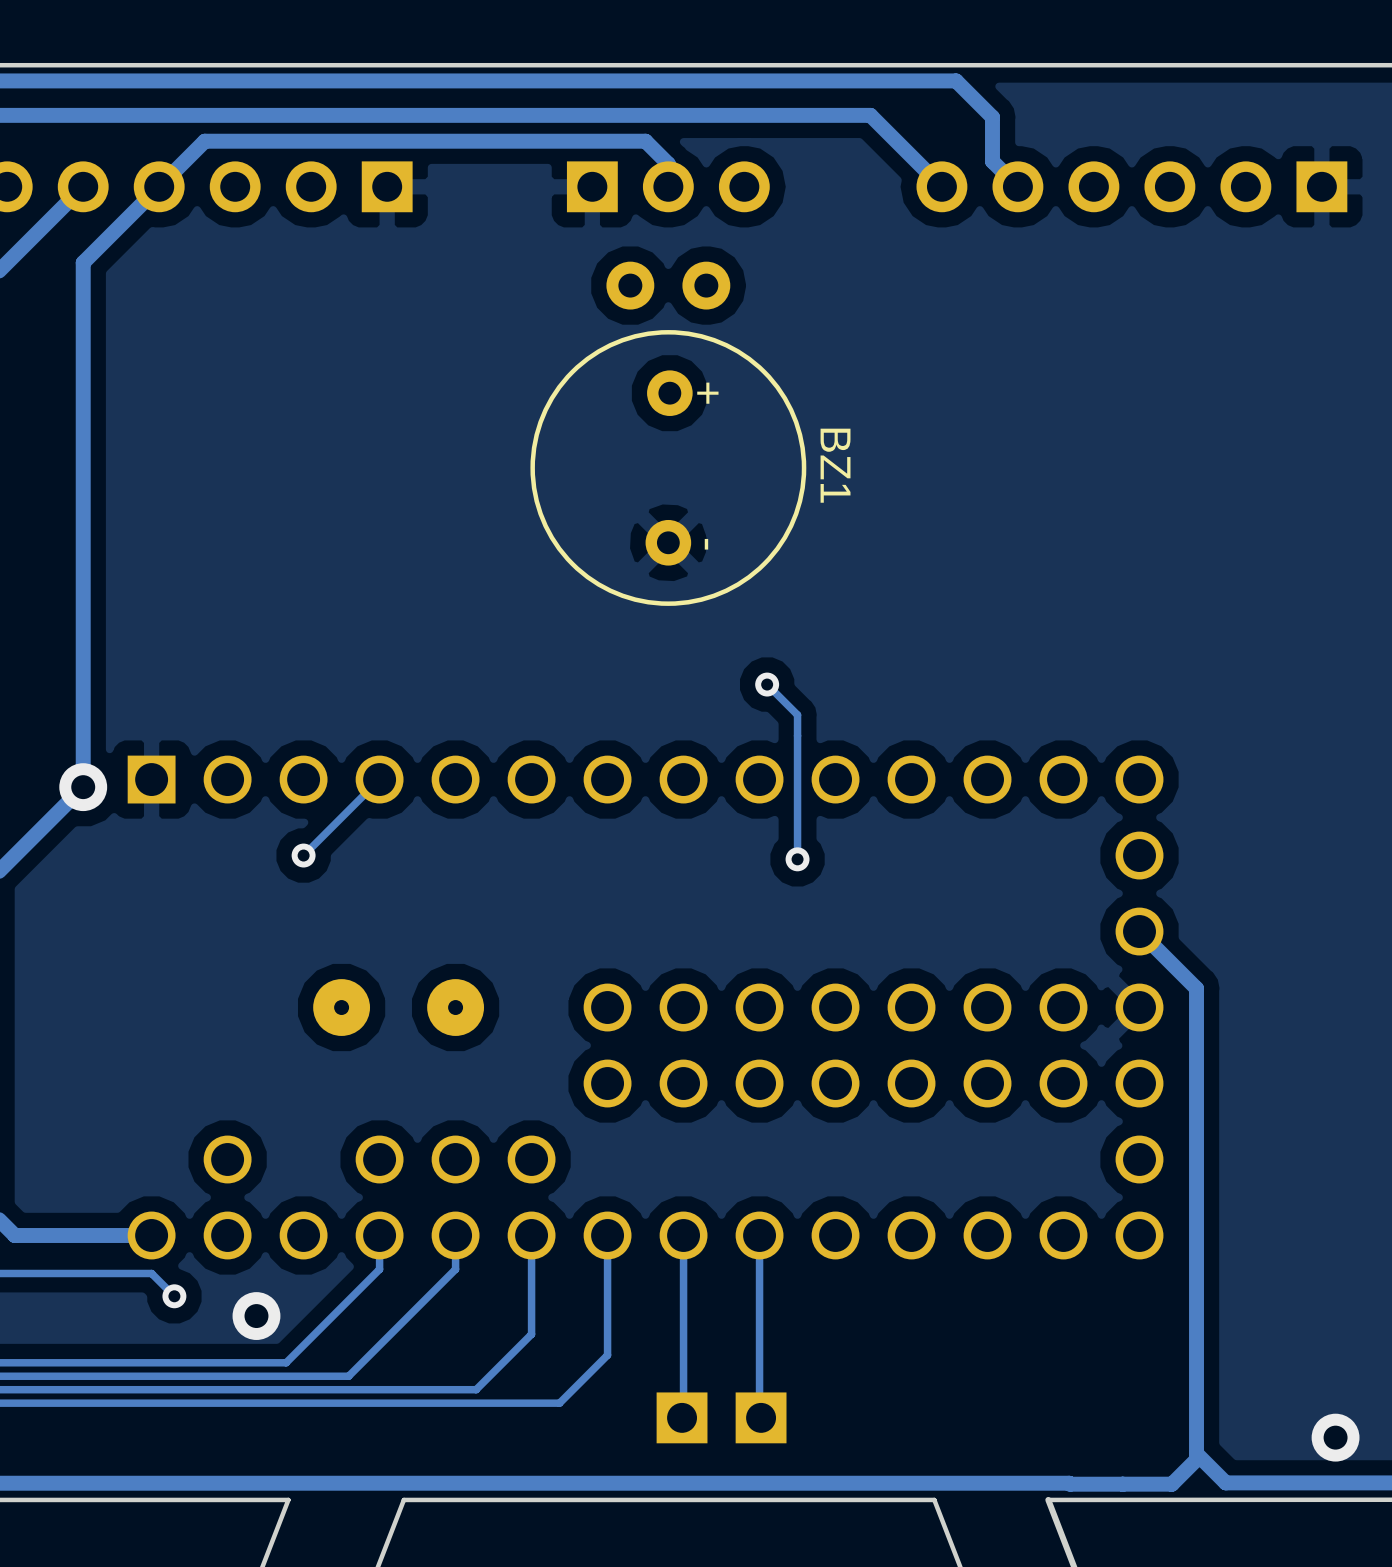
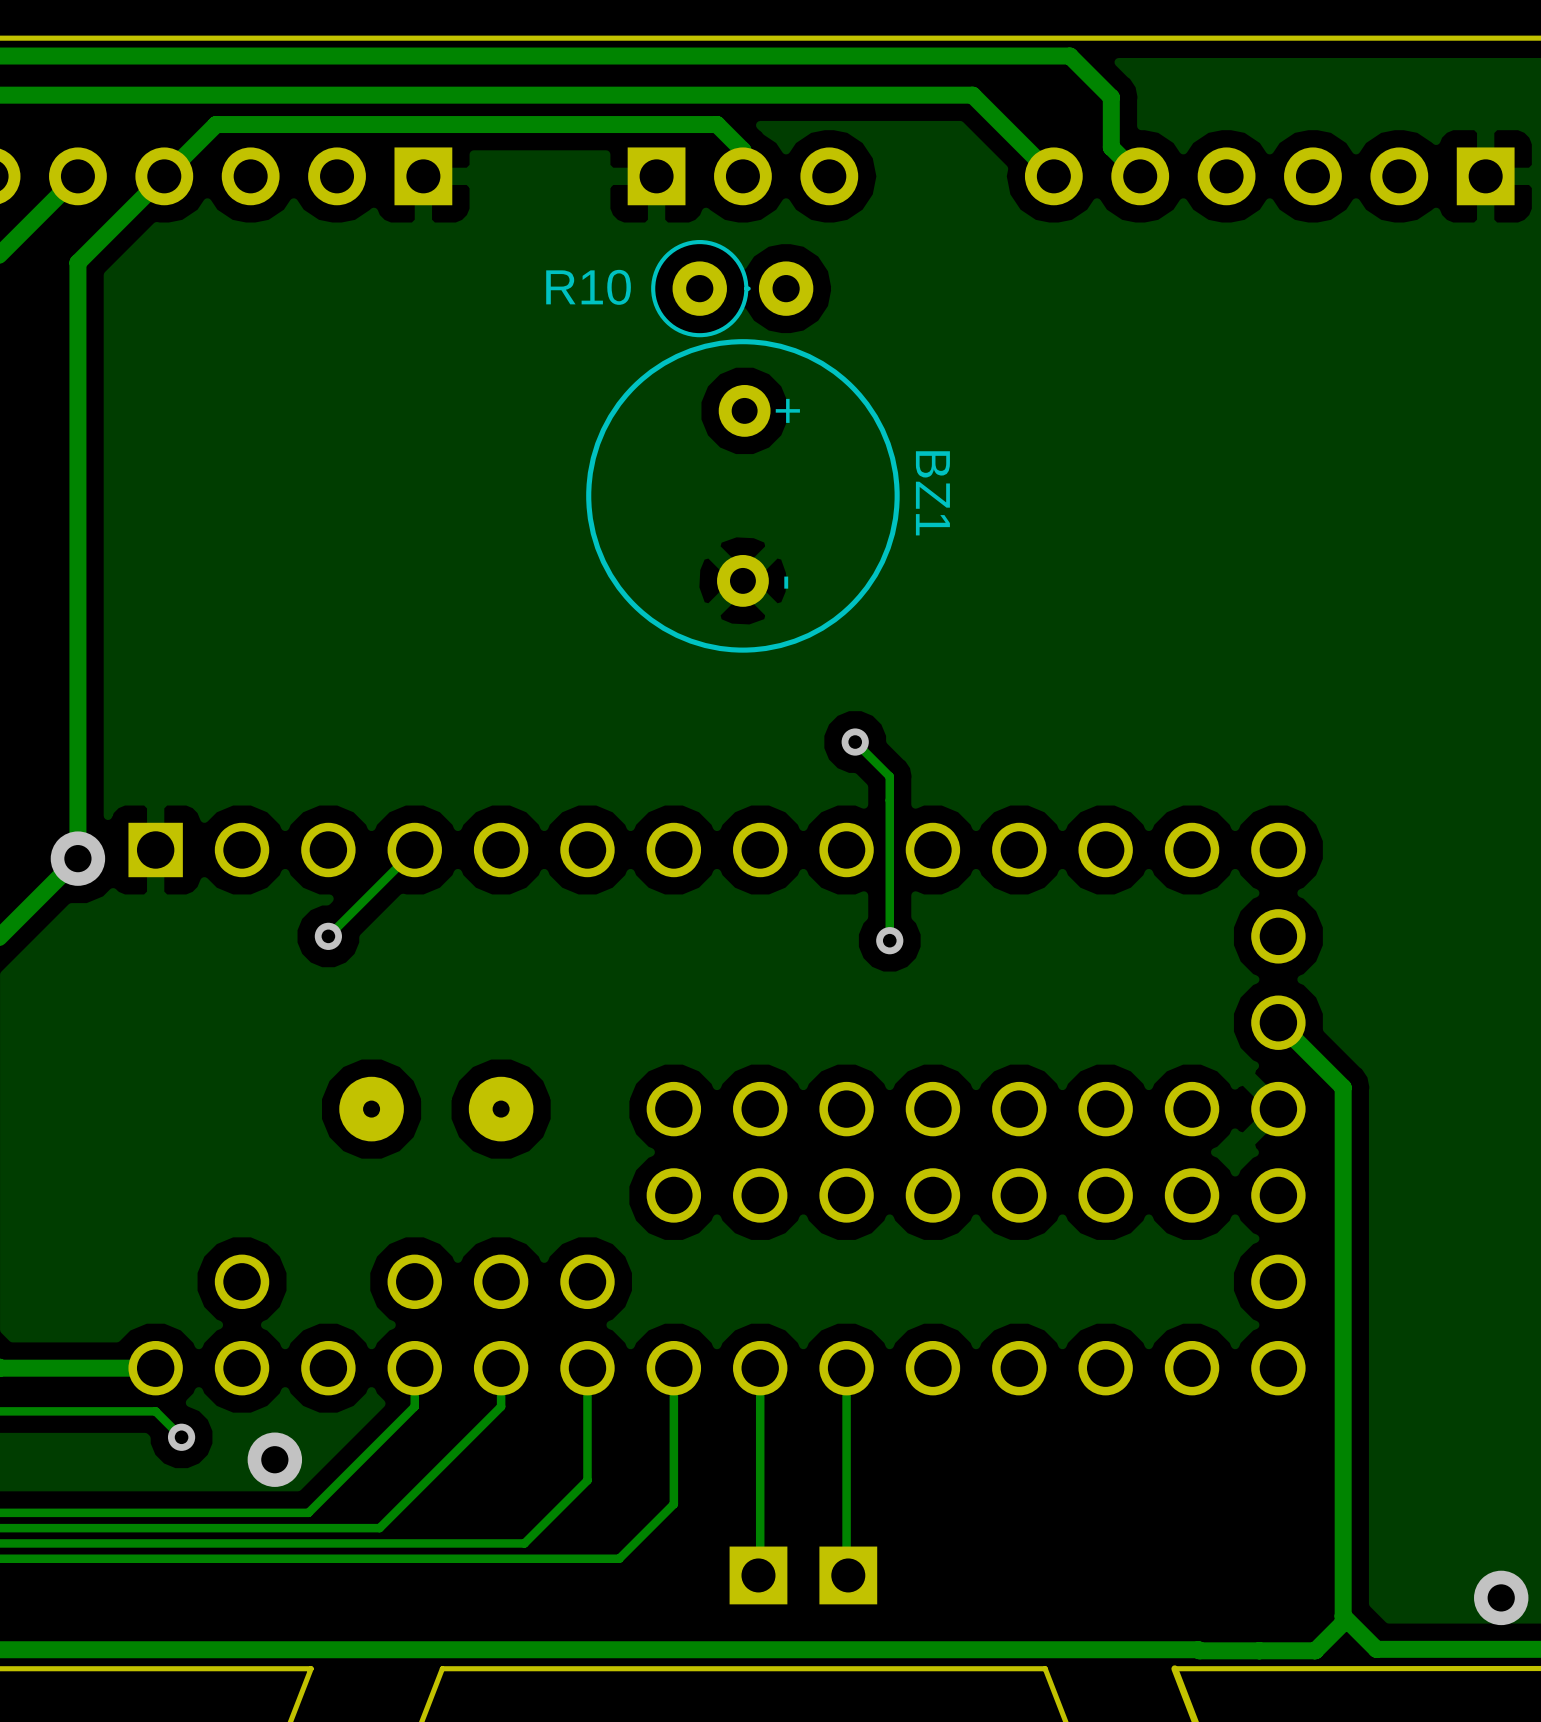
R10 side: top (668, 285) -> bottom (732, 288)

